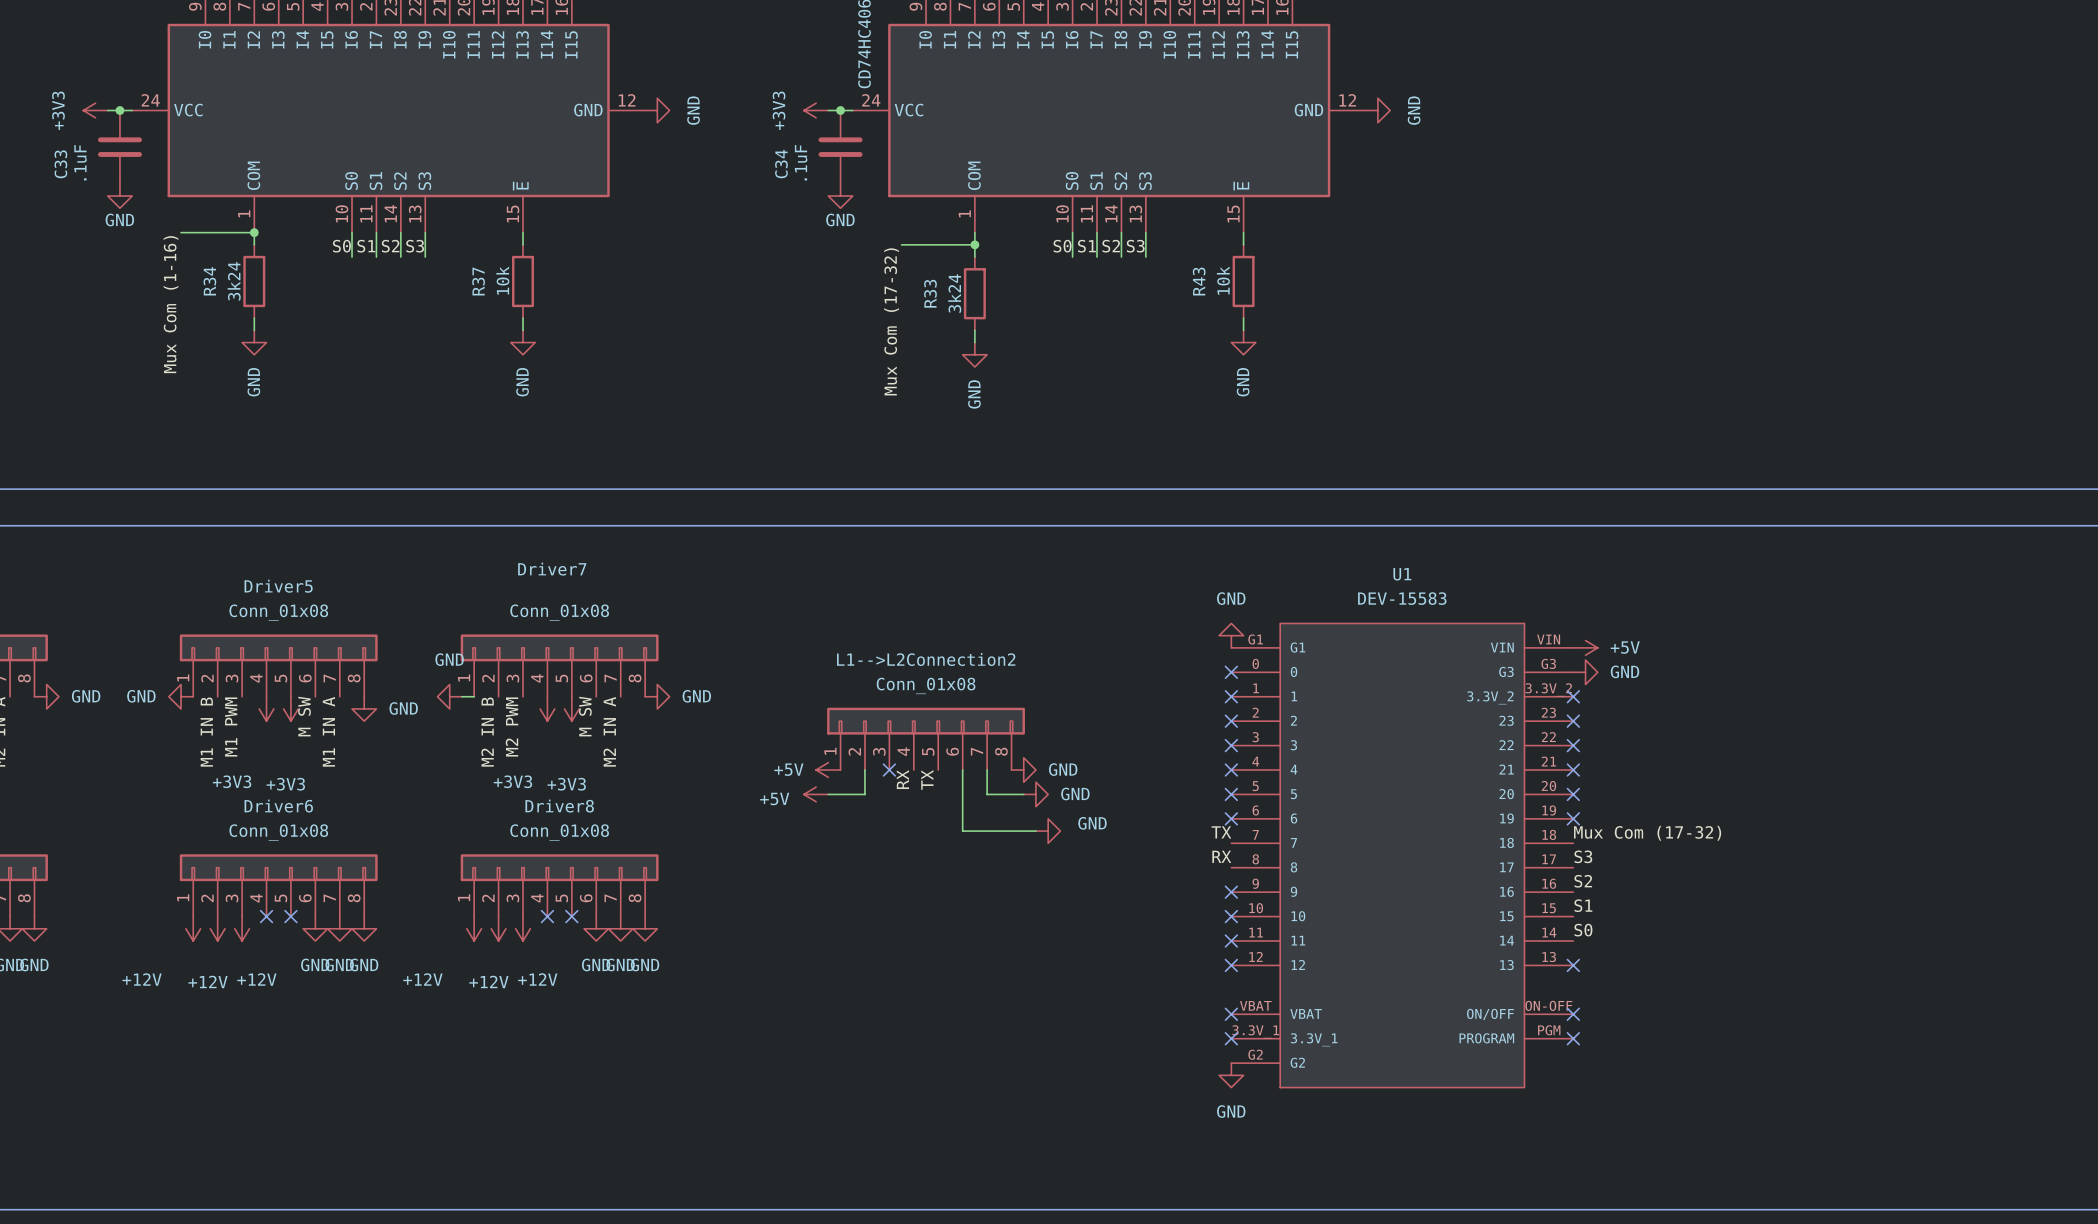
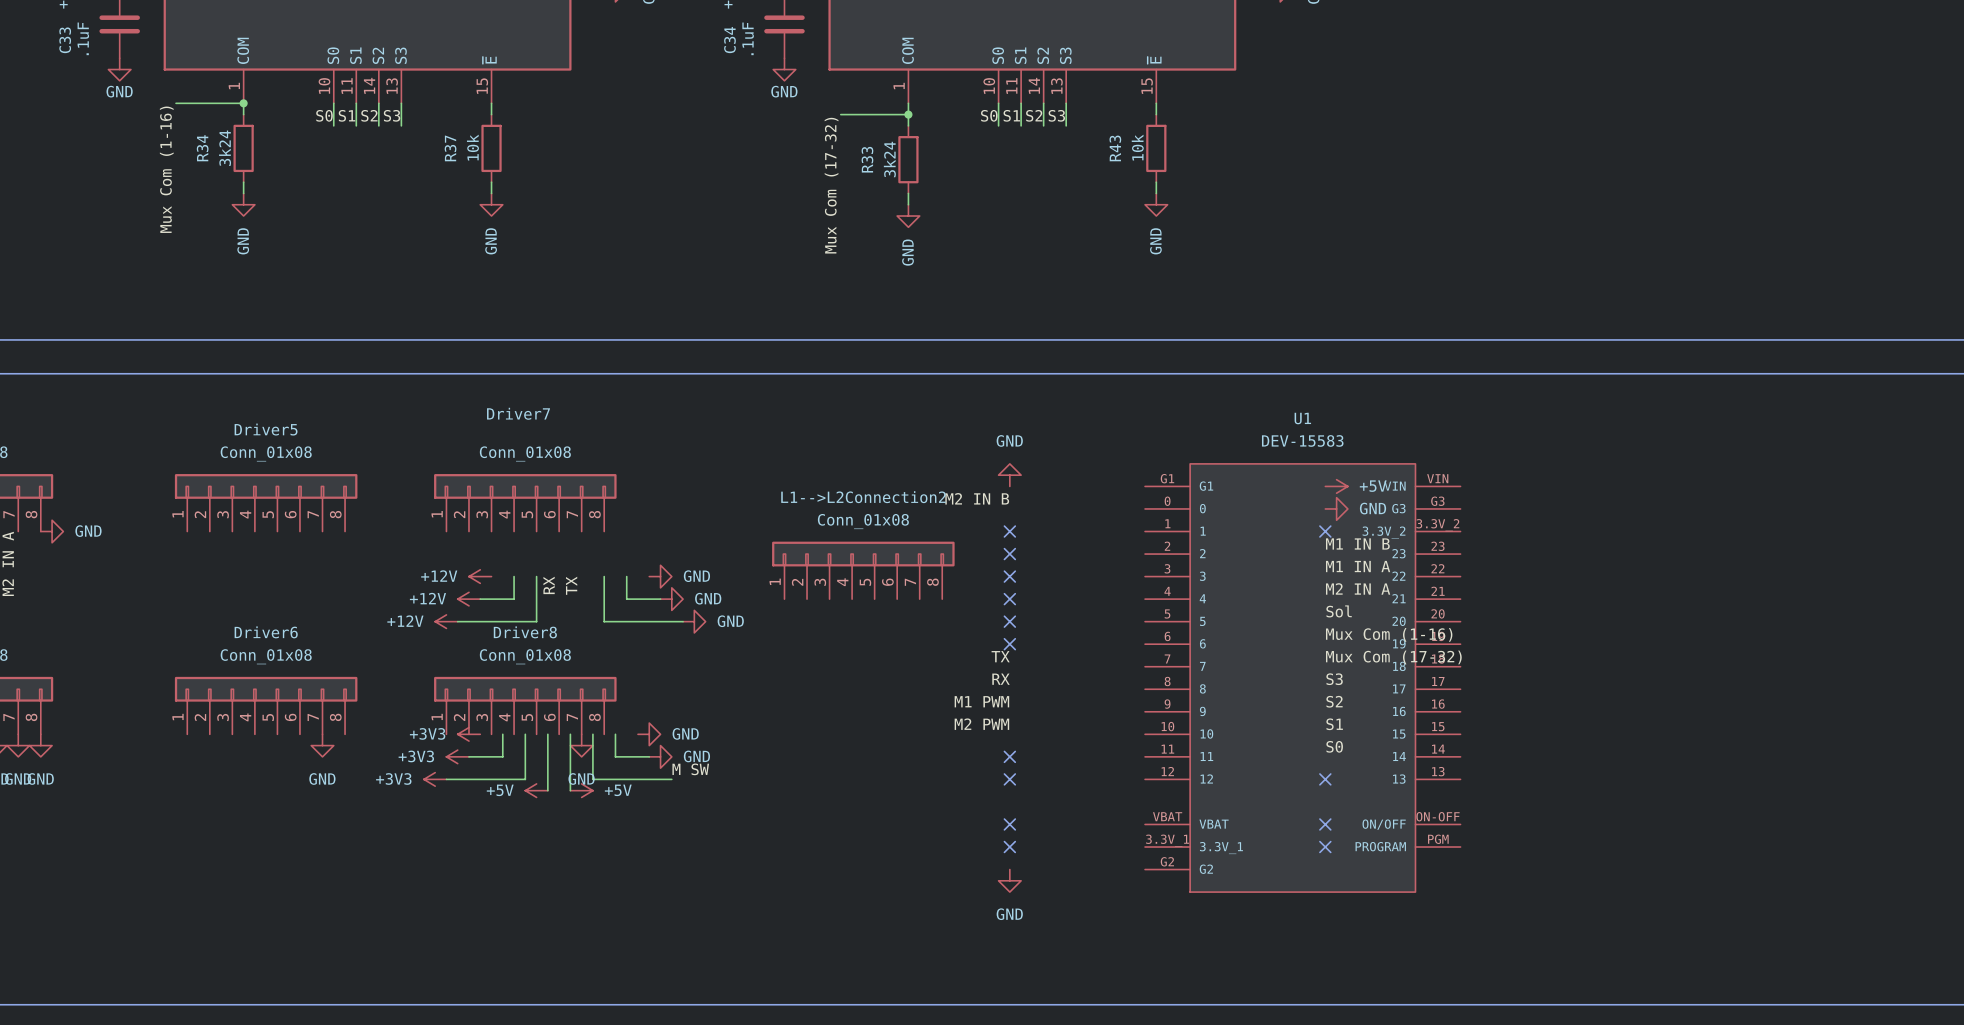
power symbol: none -> GND (1009, 475)
power symbol: GND (1231, 635) -> none
power symbol position: +5V (1585, 647) -> +5V (1336, 486)
label: none -> M2 IN B (977, 498)
no-connect mark: (1231, 672) -> none
power symbol: none -> GND (1336, 508)
power symbol: GND (1585, 672) -> none
power symbol: GND (181, 696) -> none
power symbol: GND (449, 696) -> none
wire: (461, 696) (474, 696) -> none
power symbol: GND (657, 696) -> none
no-connect mark: none -> (1009, 531)
no-connect mark: (1231, 696) -> none
no-connect mark: none -> (1325, 531)
no-connect mark: (1573, 696) -> none
power symbol: +3V3 (266, 708) -> none
power symbol: +3V3 (290, 708) -> none
power symbol: GND (364, 708) -> none
power symbol: +3V3 (547, 708) -> none
power symbol: +3V3 (571, 708) -> none
label: none -> M1 IN B (1357, 543)
label: M SW (304, 716) -> none
label: M SW (585, 716) -> none
no-connect mark: none -> (1009, 554)
no-connect mark: (1231, 721) -> none
no-connect mark: (1573, 721) -> none
label: M1 PWM (231, 727) -> none
label: M2 PWM (511, 727) -> none
label: M1 IN A (328, 731) -> none
label: M2 IN A (609, 731) -> none
label: M1 IN B (206, 732) -> none
label: M2 IN B (487, 732) -> none
label: none -> M1 IN A (1358, 566)
power symbol: none -> +12V (480, 576)
wire: none -> (514, 576) (514, 599) (480, 599)
wire: none -> (536, 576) (536, 621) (457, 621)
wire: none -> (604, 576) (604, 621) (683, 621)
wire: none -> (626, 576) (626, 599) (660, 599)
power symbol: none -> GND (660, 576)
no-connect mark: none -> (1009, 576)
no-connect mark: (1231, 745) -> none
no-connect mark: (1573, 745) -> none
label: none -> RX (549, 585)
label: none -> TX (571, 585)
label: none -> M2 IN A (1358, 588)
power symbol: none -> +12V (468, 599)
power symbol: none -> GND (671, 599)
power symbol: +5V (828, 770) -> none
wire: (864, 770) (864, 794) (828, 794) -> none
no-connect mark: (889, 770) -> none
wire: (962, 770) (962, 831) (1035, 831) -> none
wire: (987, 770) (987, 794) (1023, 794) -> none
power symbol: GND (1023, 770) -> none
no-connect mark: none -> (1009, 599)
no-connect mark: (1231, 770) -> none
no-connect mark: (1573, 770) -> none
label: RX (902, 779) -> none
label: TX (927, 779) -> none
label: none -> Sol (1339, 611)
power symbol: none -> +12V (446, 621)
power symbol: none -> GND (694, 621)
power symbol: +5V (816, 794) -> none
power symbol: GND (1035, 794) -> none
no-connect mark: none -> (1009, 621)
no-connect mark: (1231, 794) -> none
no-connect mark: (1573, 794) -> none
label: none -> Mux Com (1-16) (1389, 634)
no-connect mark: none -> (1009, 644)
no-connect mark: (1231, 818) -> none
no-connect mark: (1573, 818) -> none
power symbol: GND (1048, 831) -> none
label: none -> TX (1000, 656)
label: TX (1221, 832) -> none
label position: Mux Com (17-32) (1647, 833) -> Mux Com (17-32) (1393, 657)
label: none -> RX (1001, 679)
label: RX (1221, 856) -> none
label position: S3 (1583, 856) -> S3 (1334, 679)
label: none -> M1 PWM (981, 701)
label position: S2 (1583, 881) -> S2 (1334, 701)
no-connect mark: (1231, 892) -> none
label: none -> M2 PWM (981, 724)
label position: S1 (1583, 905) -> S1 (1334, 724)
no-connect mark: (266, 916) -> none
no-connect mark: (290, 916) -> none
power symbol: none -> +3V3 (468, 734)
wire: none -> (502, 734) (502, 756) (468, 756)
no-connect mark: (547, 916) -> none
wire: none -> (525, 734) (525, 779) (446, 779)
no-connect mark: (571, 916) -> none
wire: none -> (547, 734) (547, 790)
wire: none -> (570, 734) (570, 790)
wire: none -> (592, 734) (592, 779) (671, 779)
wire: none -> (615, 734) (615, 756) (649, 756)
power symbol: none -> GND (649, 734)
no-connect mark: (1231, 916) -> none
power symbol: +12V (193, 928) -> none
power symbol: +12V (217, 928) -> none
power symbol: +12V (242, 928) -> none
power symbol: GND (315, 928) -> none
power symbol: GND (364, 928) -> none
power symbol: +12V (474, 928) -> none
power symbol: +12V (498, 928) -> none
power symbol: +12V (522, 928) -> none
power symbol: GND (596, 928) -> none
power symbol: GND (645, 928) -> none
label position: S0 (1583, 930) -> S0 (1334, 746)
power symbol: none -> +3V3 (457, 756)
power symbol: none -> GND (660, 756)
no-connect mark: none -> (1009, 756)
no-connect mark: (1231, 941) -> none
label: none -> M SW (690, 769)
power symbol: none -> +3V3 (435, 779)
no-connect mark: none -> (1009, 779)
no-connect mark: (1231, 965) -> none
no-connect mark: none -> (1325, 779)
no-connect mark: (1573, 965) -> none
power symbol: none -> +5V (536, 790)
power symbol: none -> +5V (581, 790)
no-connect mark: none -> (1009, 824)
no-connect mark: (1231, 1014) -> none
no-connect mark: none -> (1325, 824)
no-connect mark: (1573, 1014) -> none
no-connect mark: none -> (1009, 847)
no-connect mark: (1231, 1038) -> none
no-connect mark: none -> (1325, 847)
no-connect mark: (1573, 1038) -> none
power symbol: none -> GND (1009, 880)
power symbol: GND (1231, 1075) -> none

